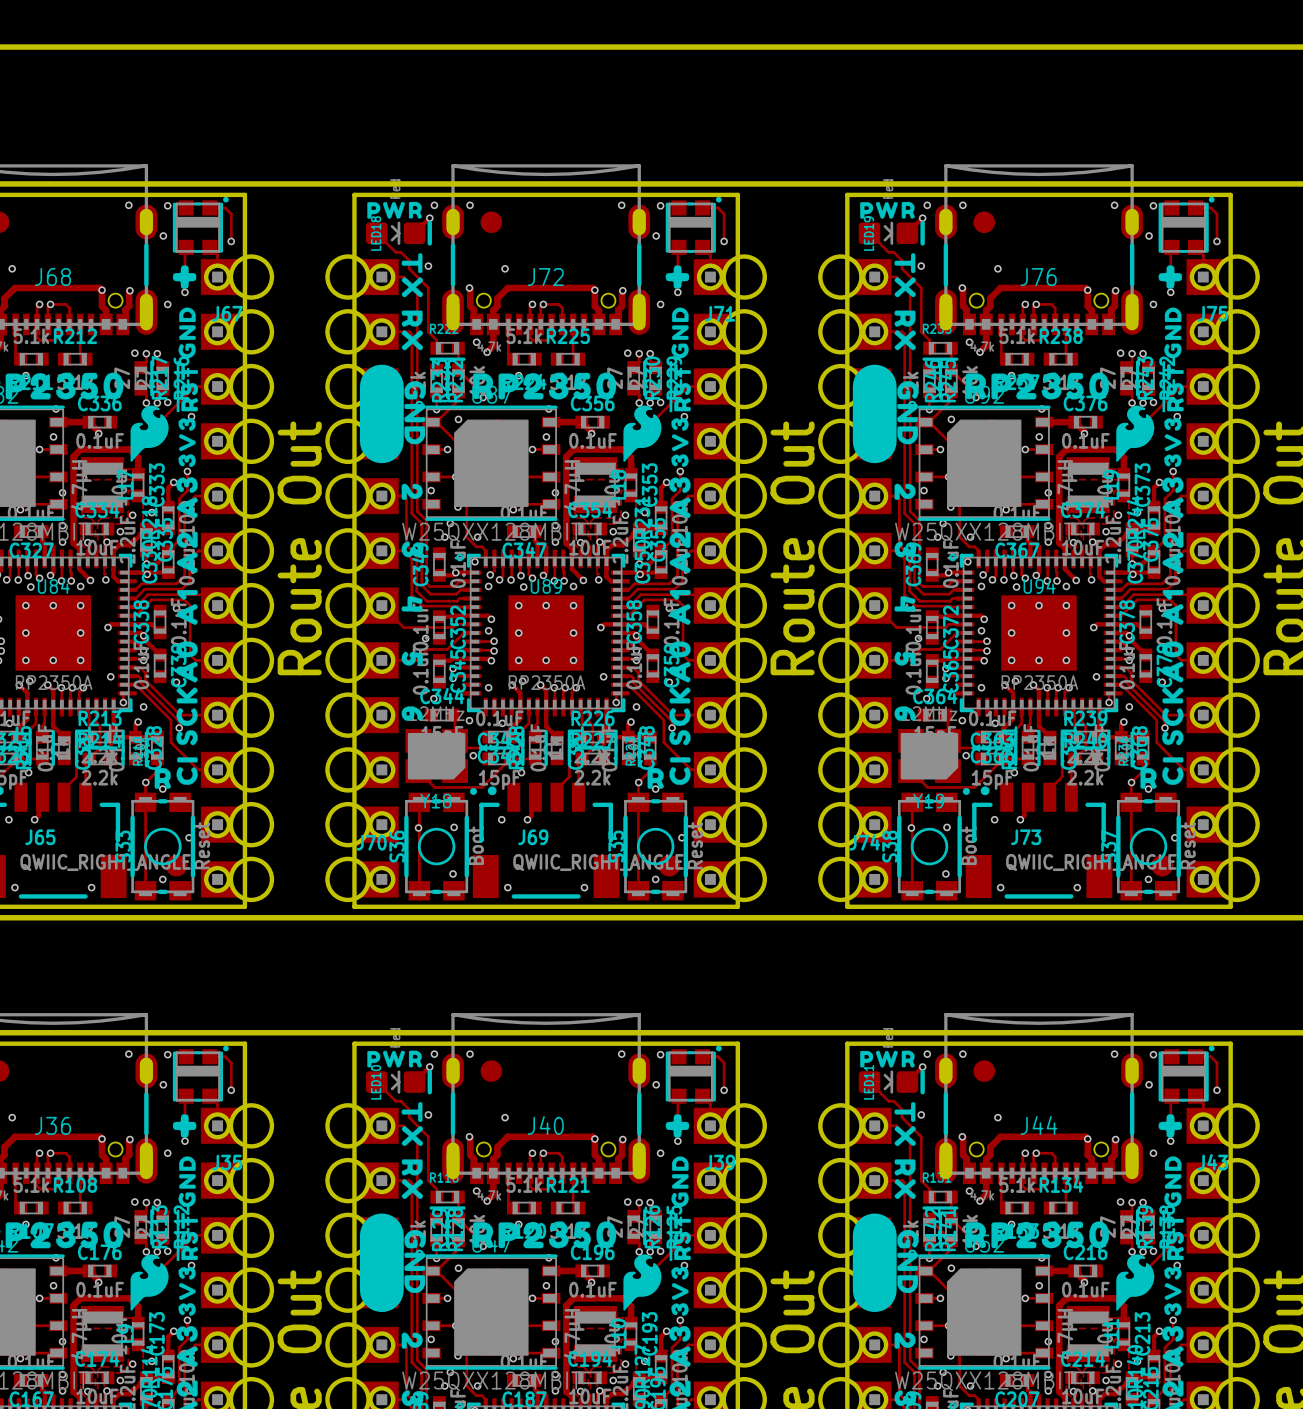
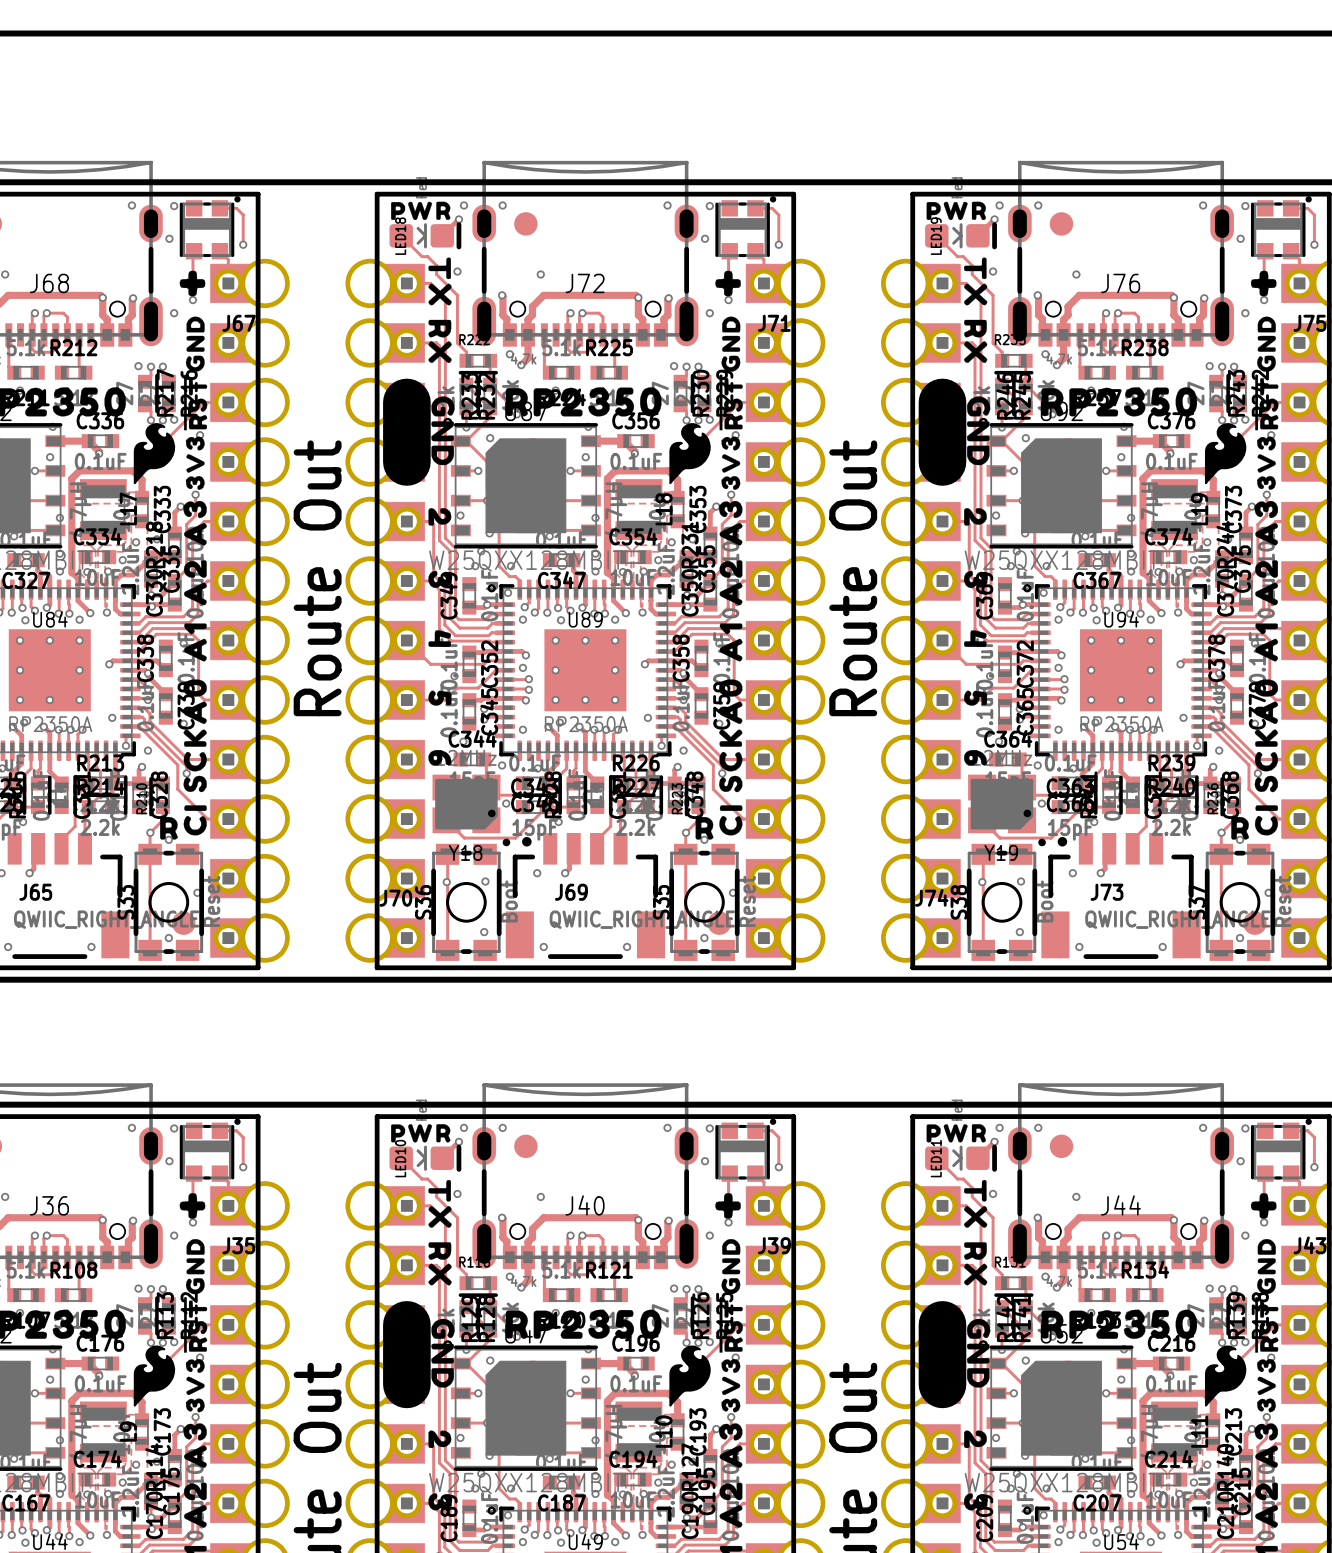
drawing: none -> [488, 809, 496, 818]
drawing: none -> [1023, 809, 1032, 818]

